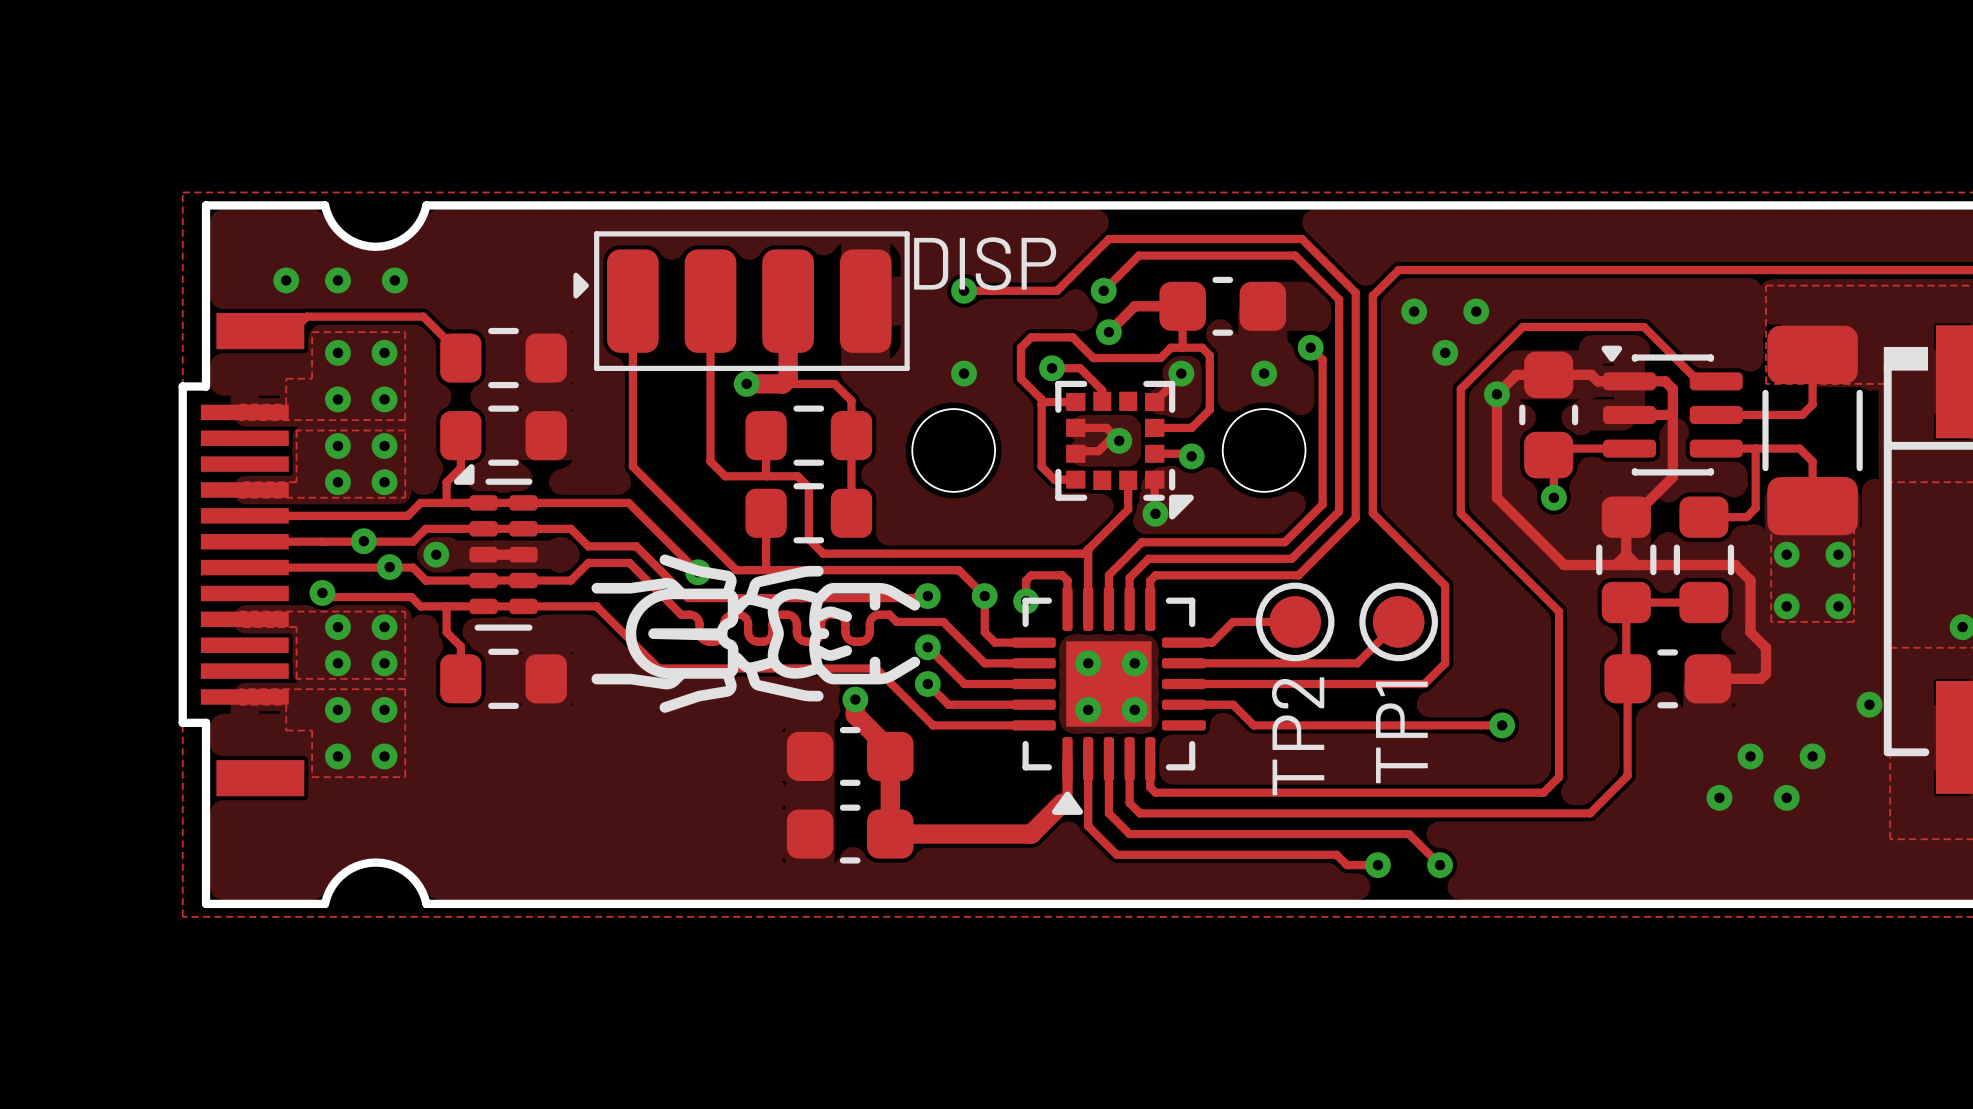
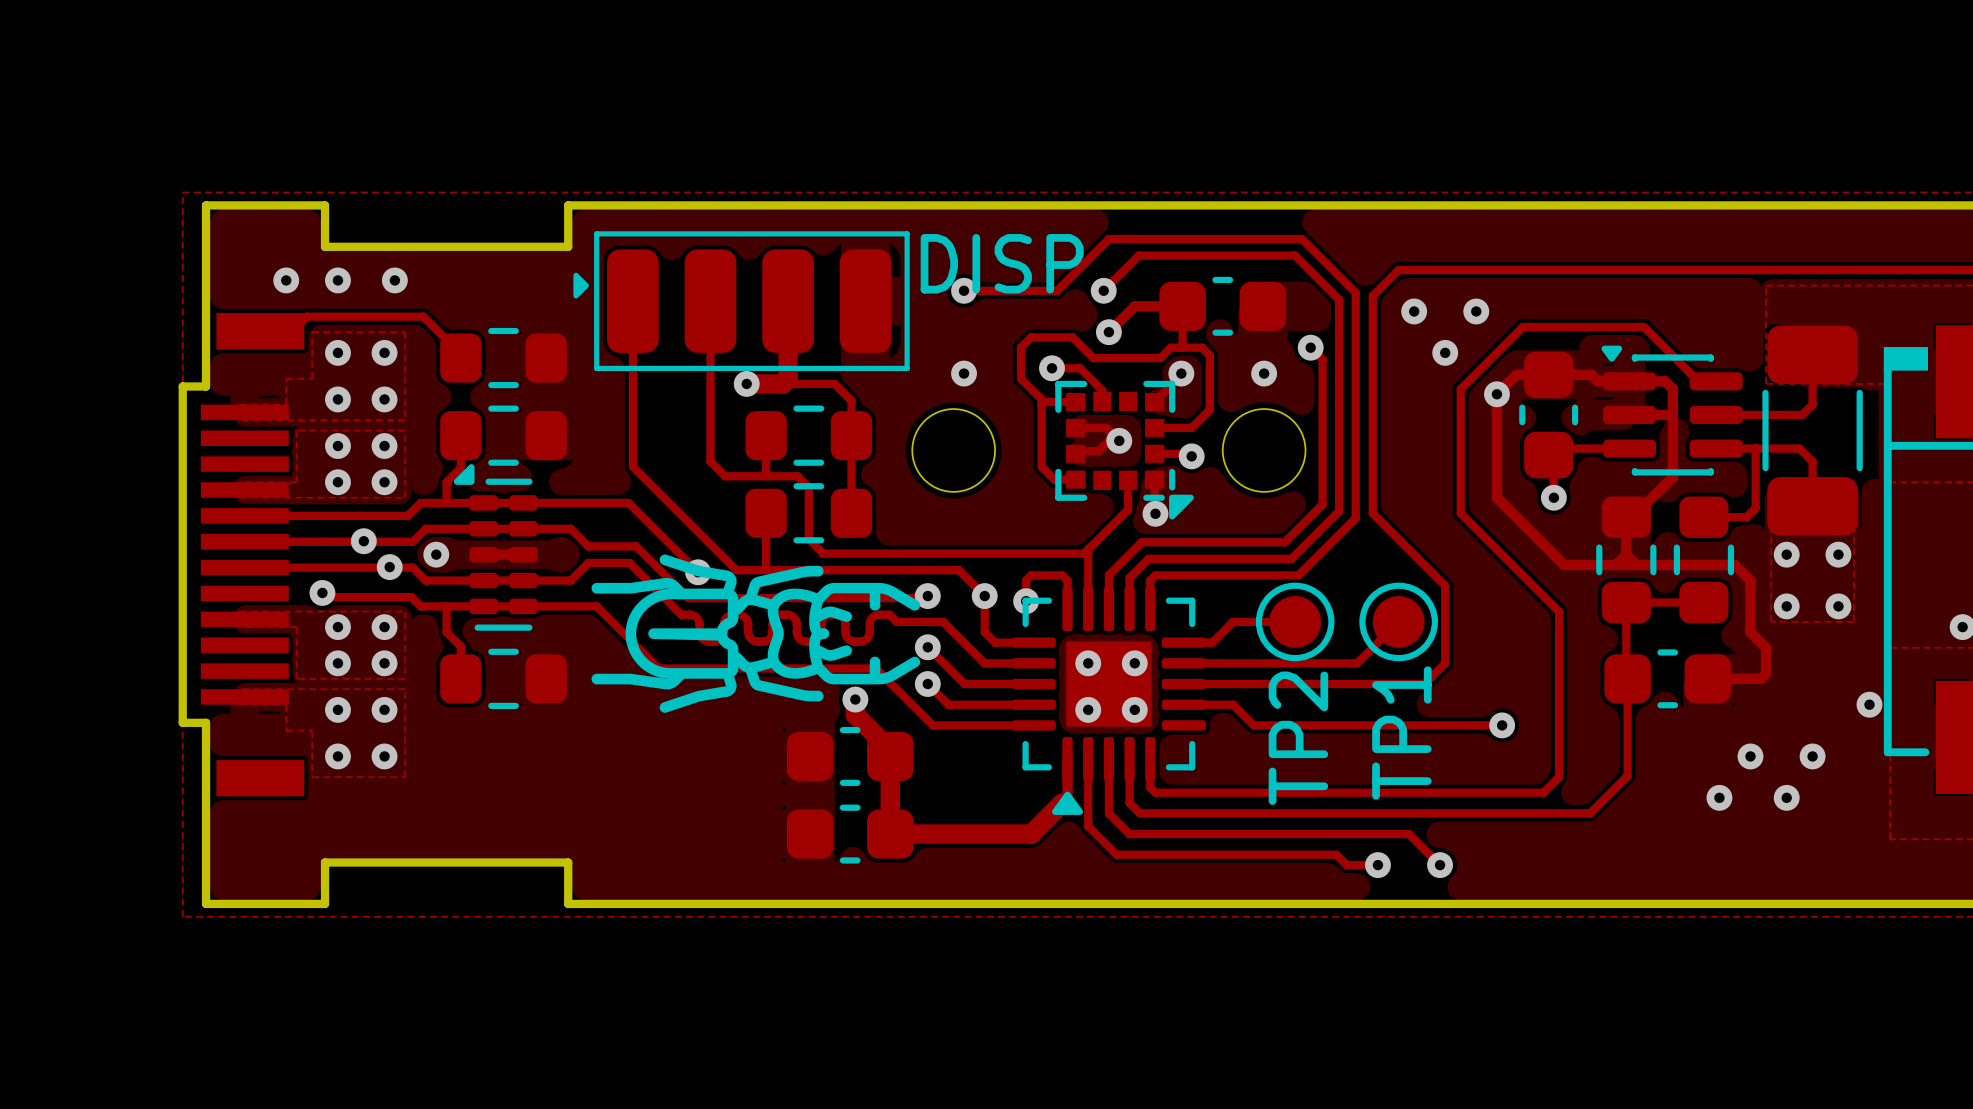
board edge: (325, 205) (329, 217) (340, 233) (356, 243) (375, 246) (394, 243) (410, 233) (419, 223) (426, 205) (568, 205) -> (325, 205) (325, 246) (568, 246) (568, 205)
board edge: (325, 903) (332, 886) (340, 876) (356, 866) (375, 862) (388, 864) (405, 872) (419, 886) (426, 903) (568, 903) -> (325, 903) (325, 862) (568, 862) (568, 903)

